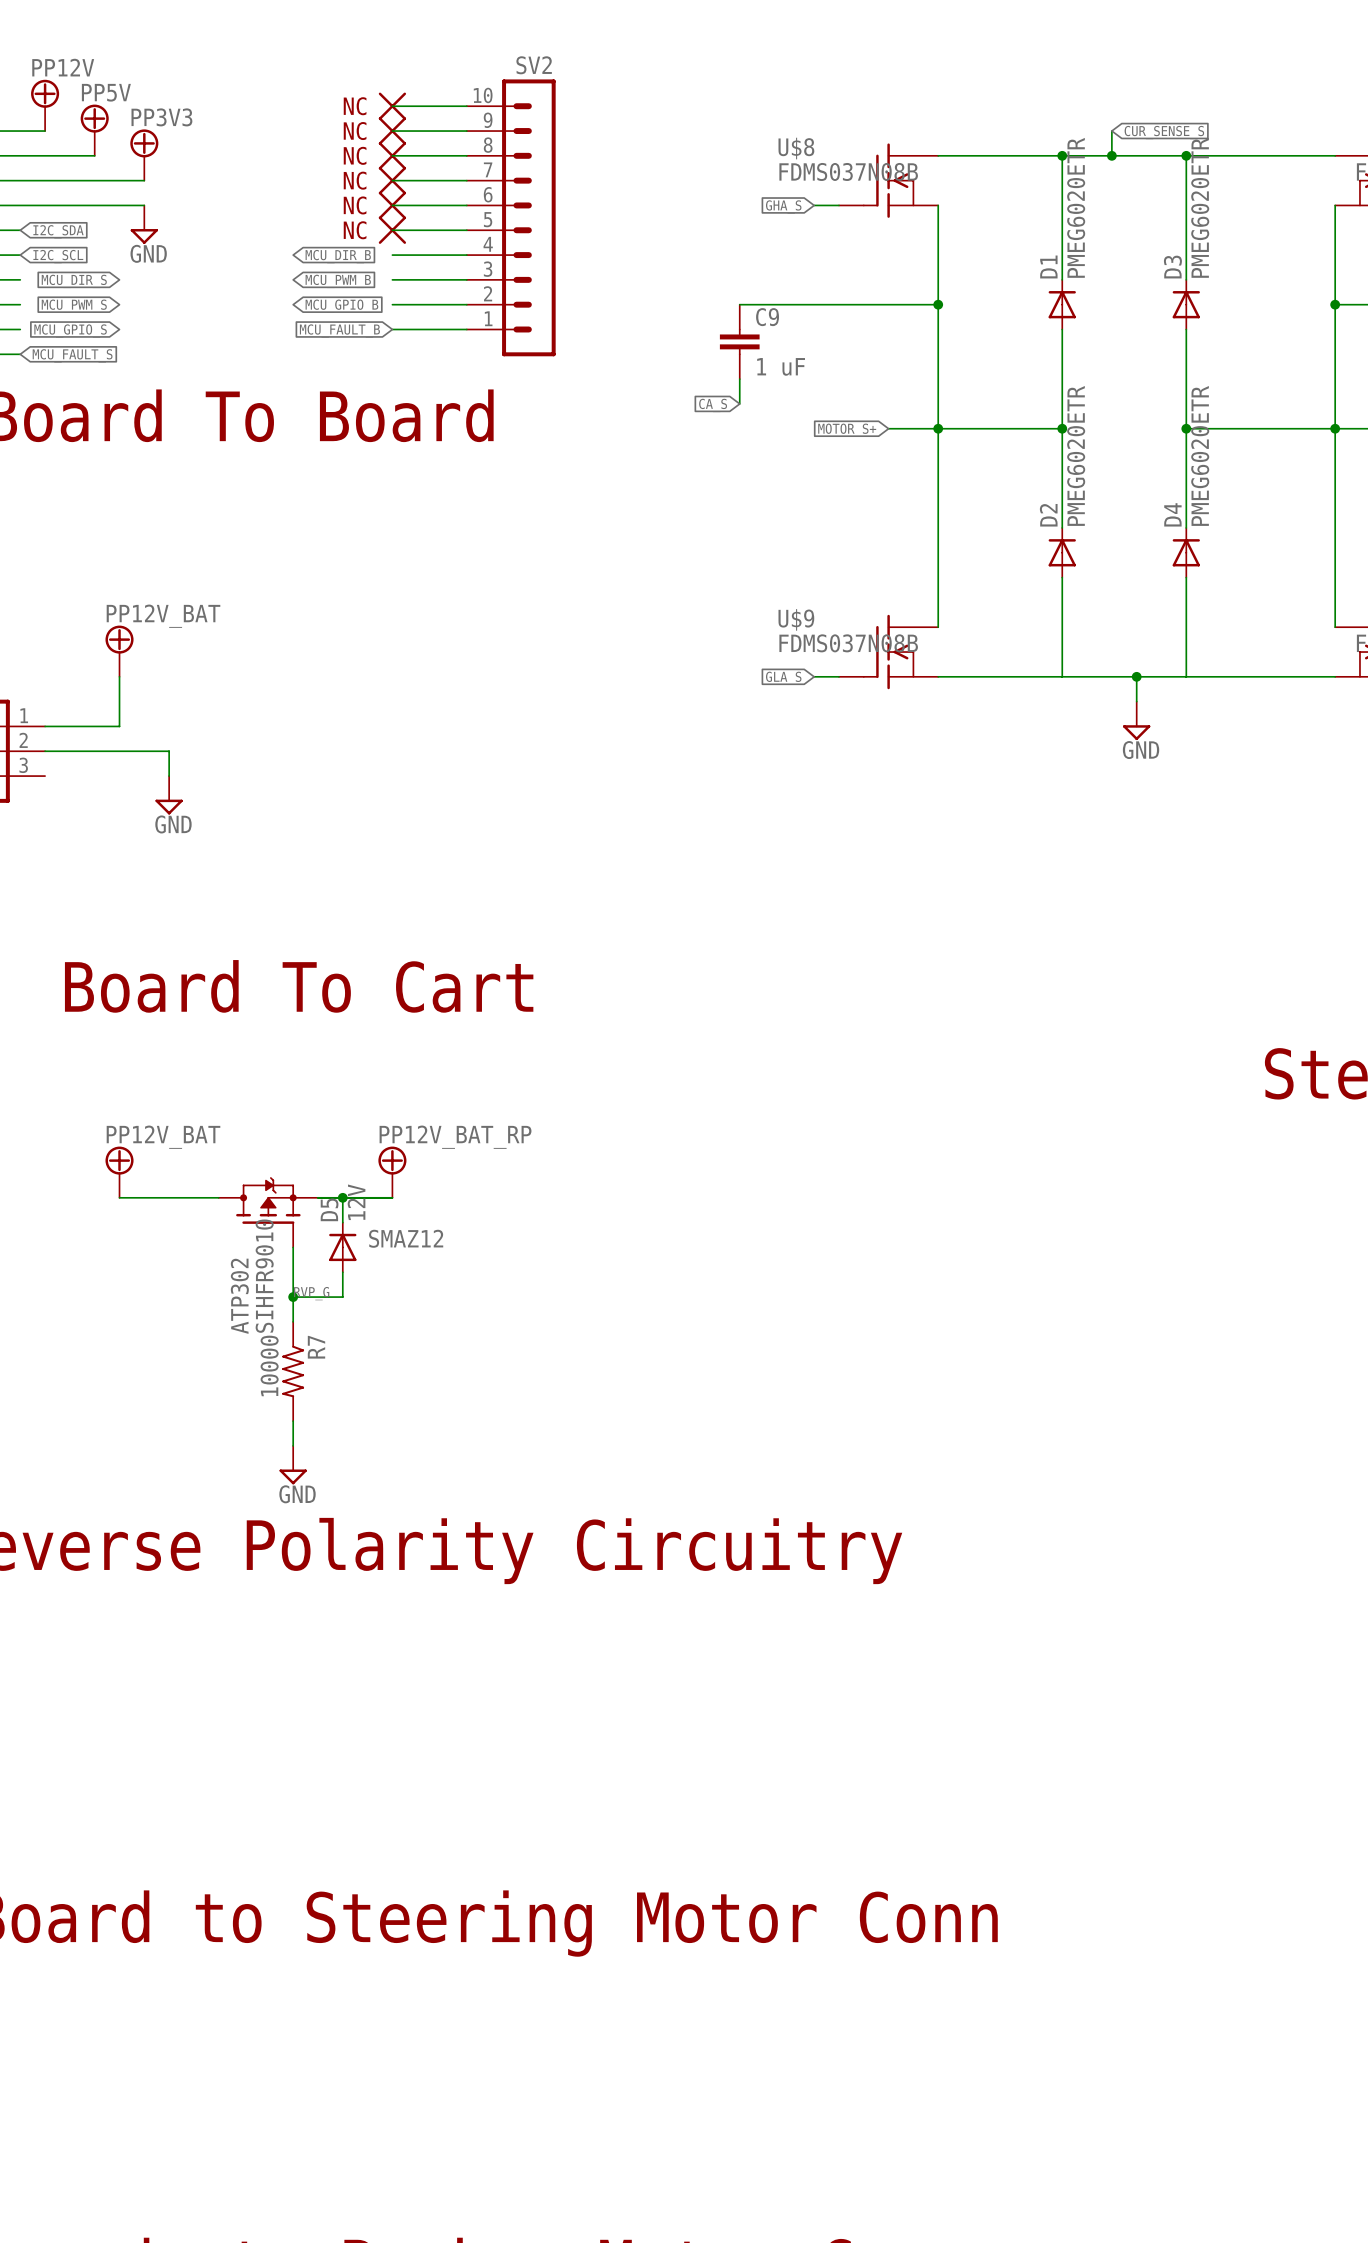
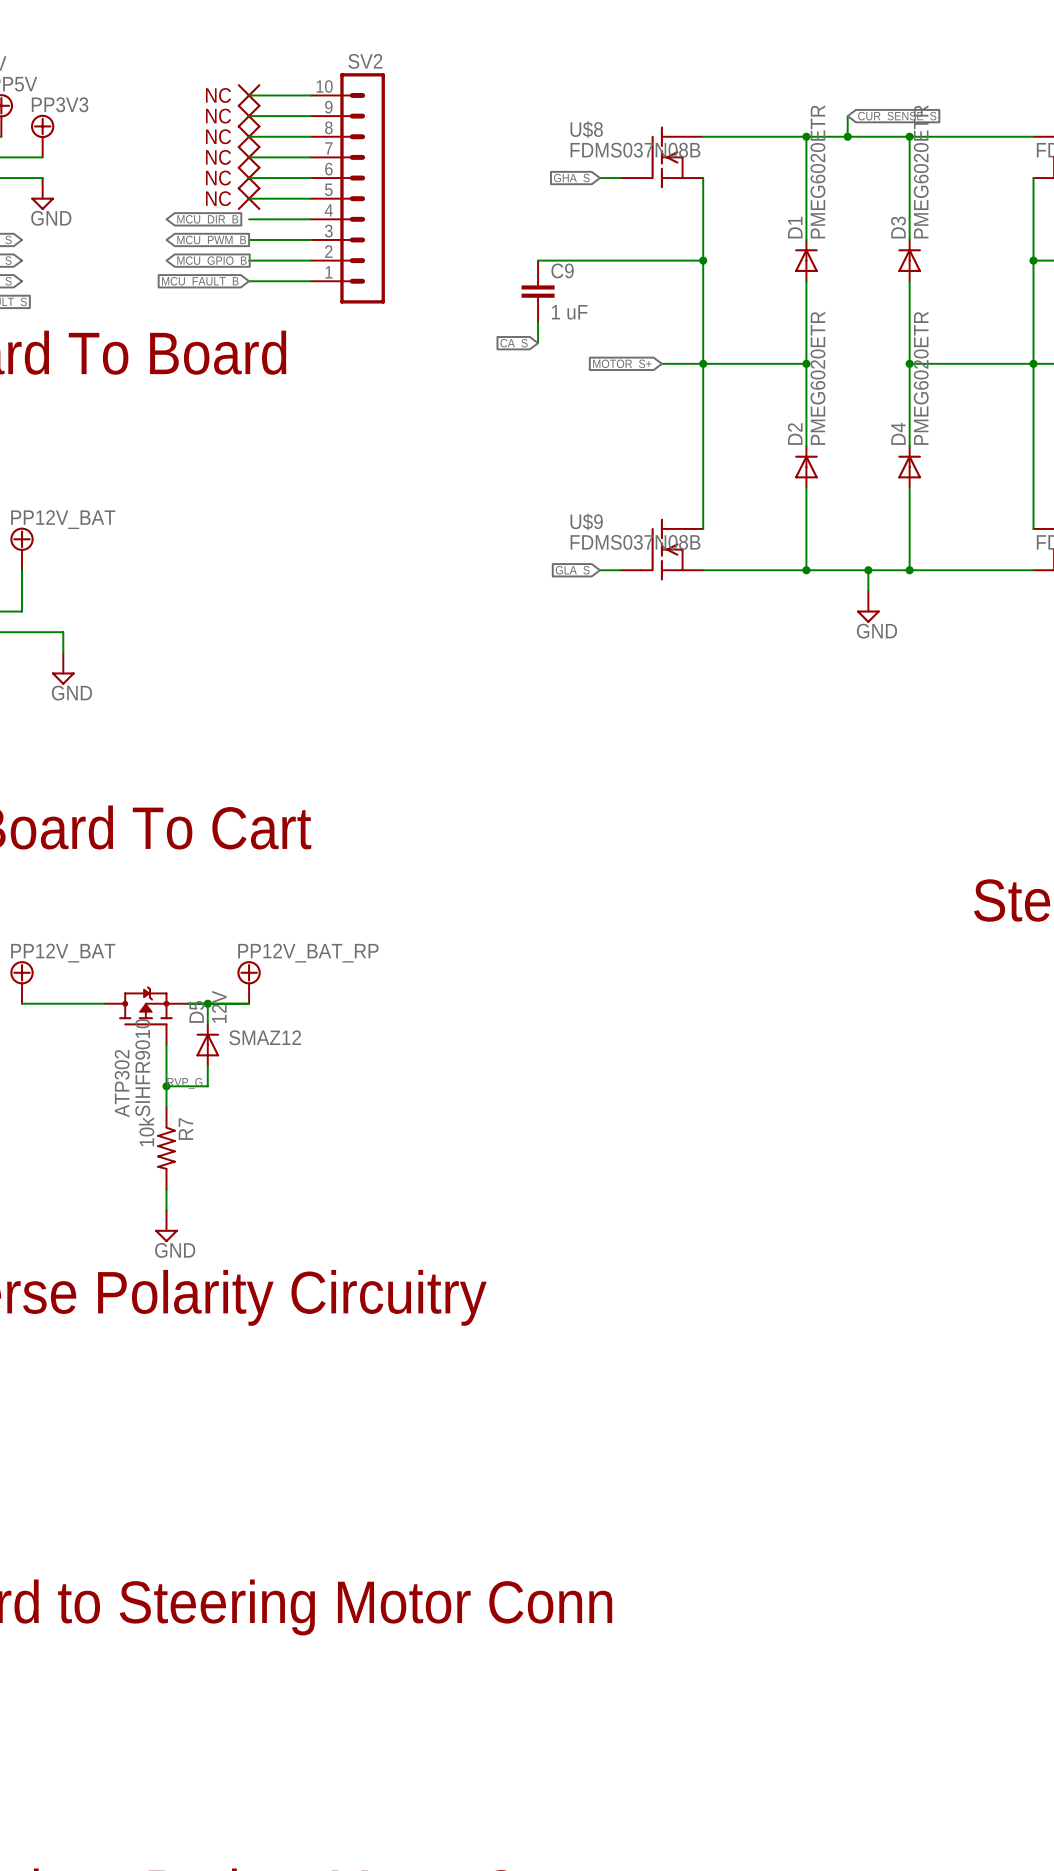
junction: none -> (806, 570)
junction: none -> (909, 570)
R7 value: 10000 (269, 1365) -> 10k (146, 1131)

